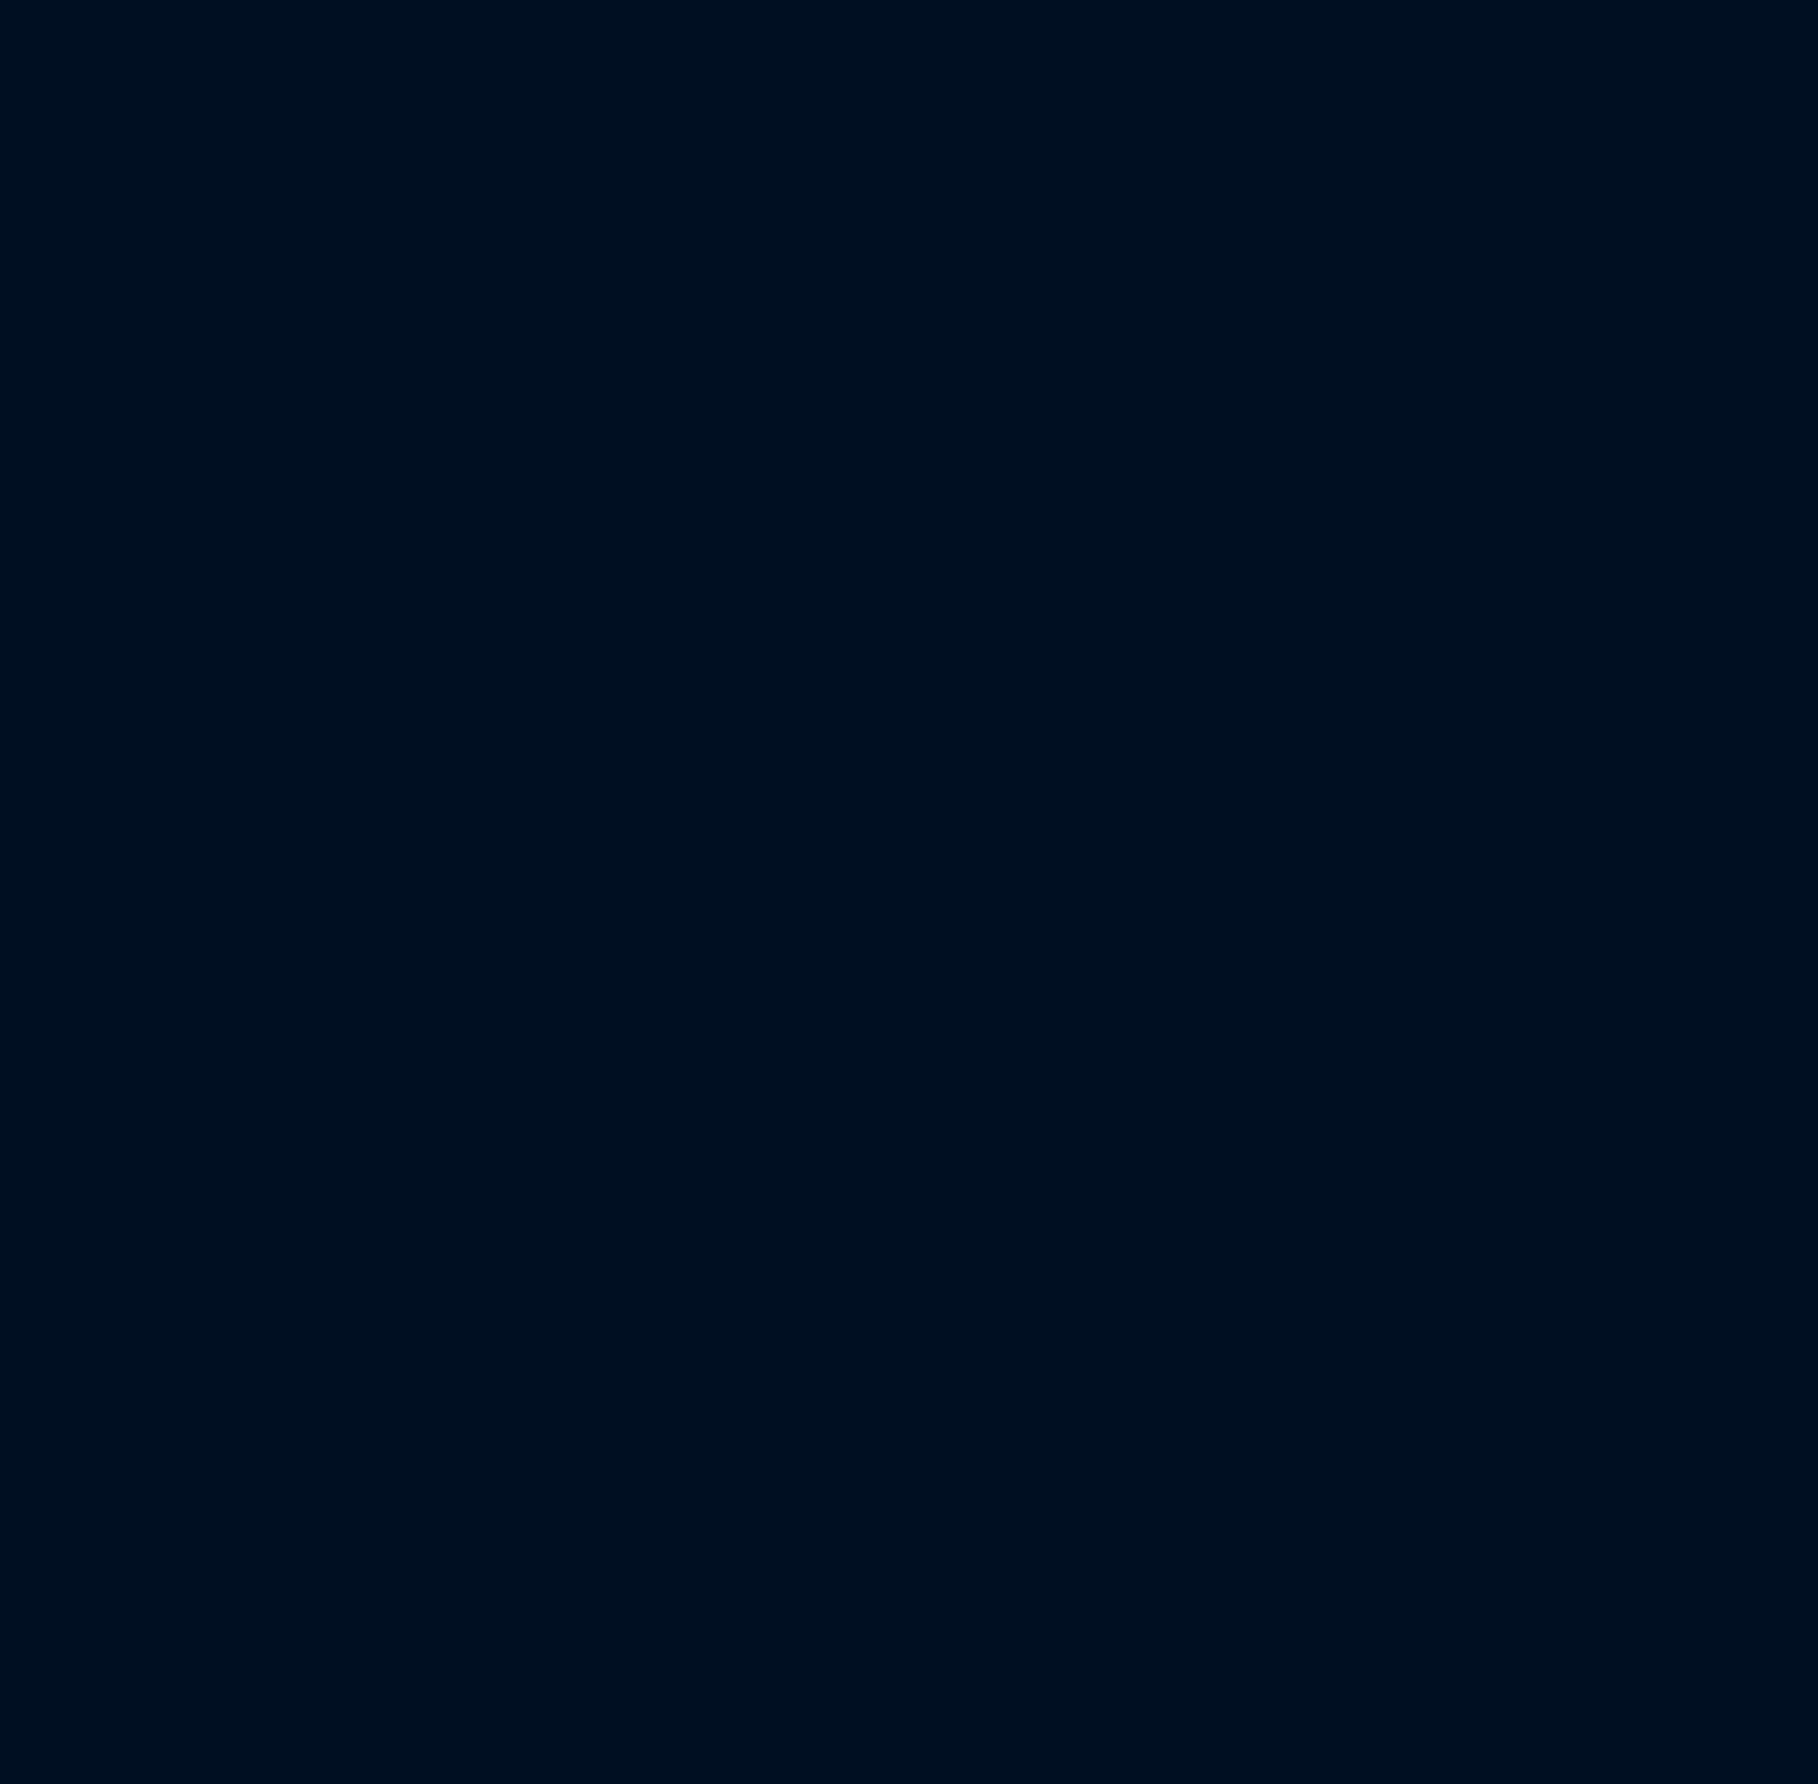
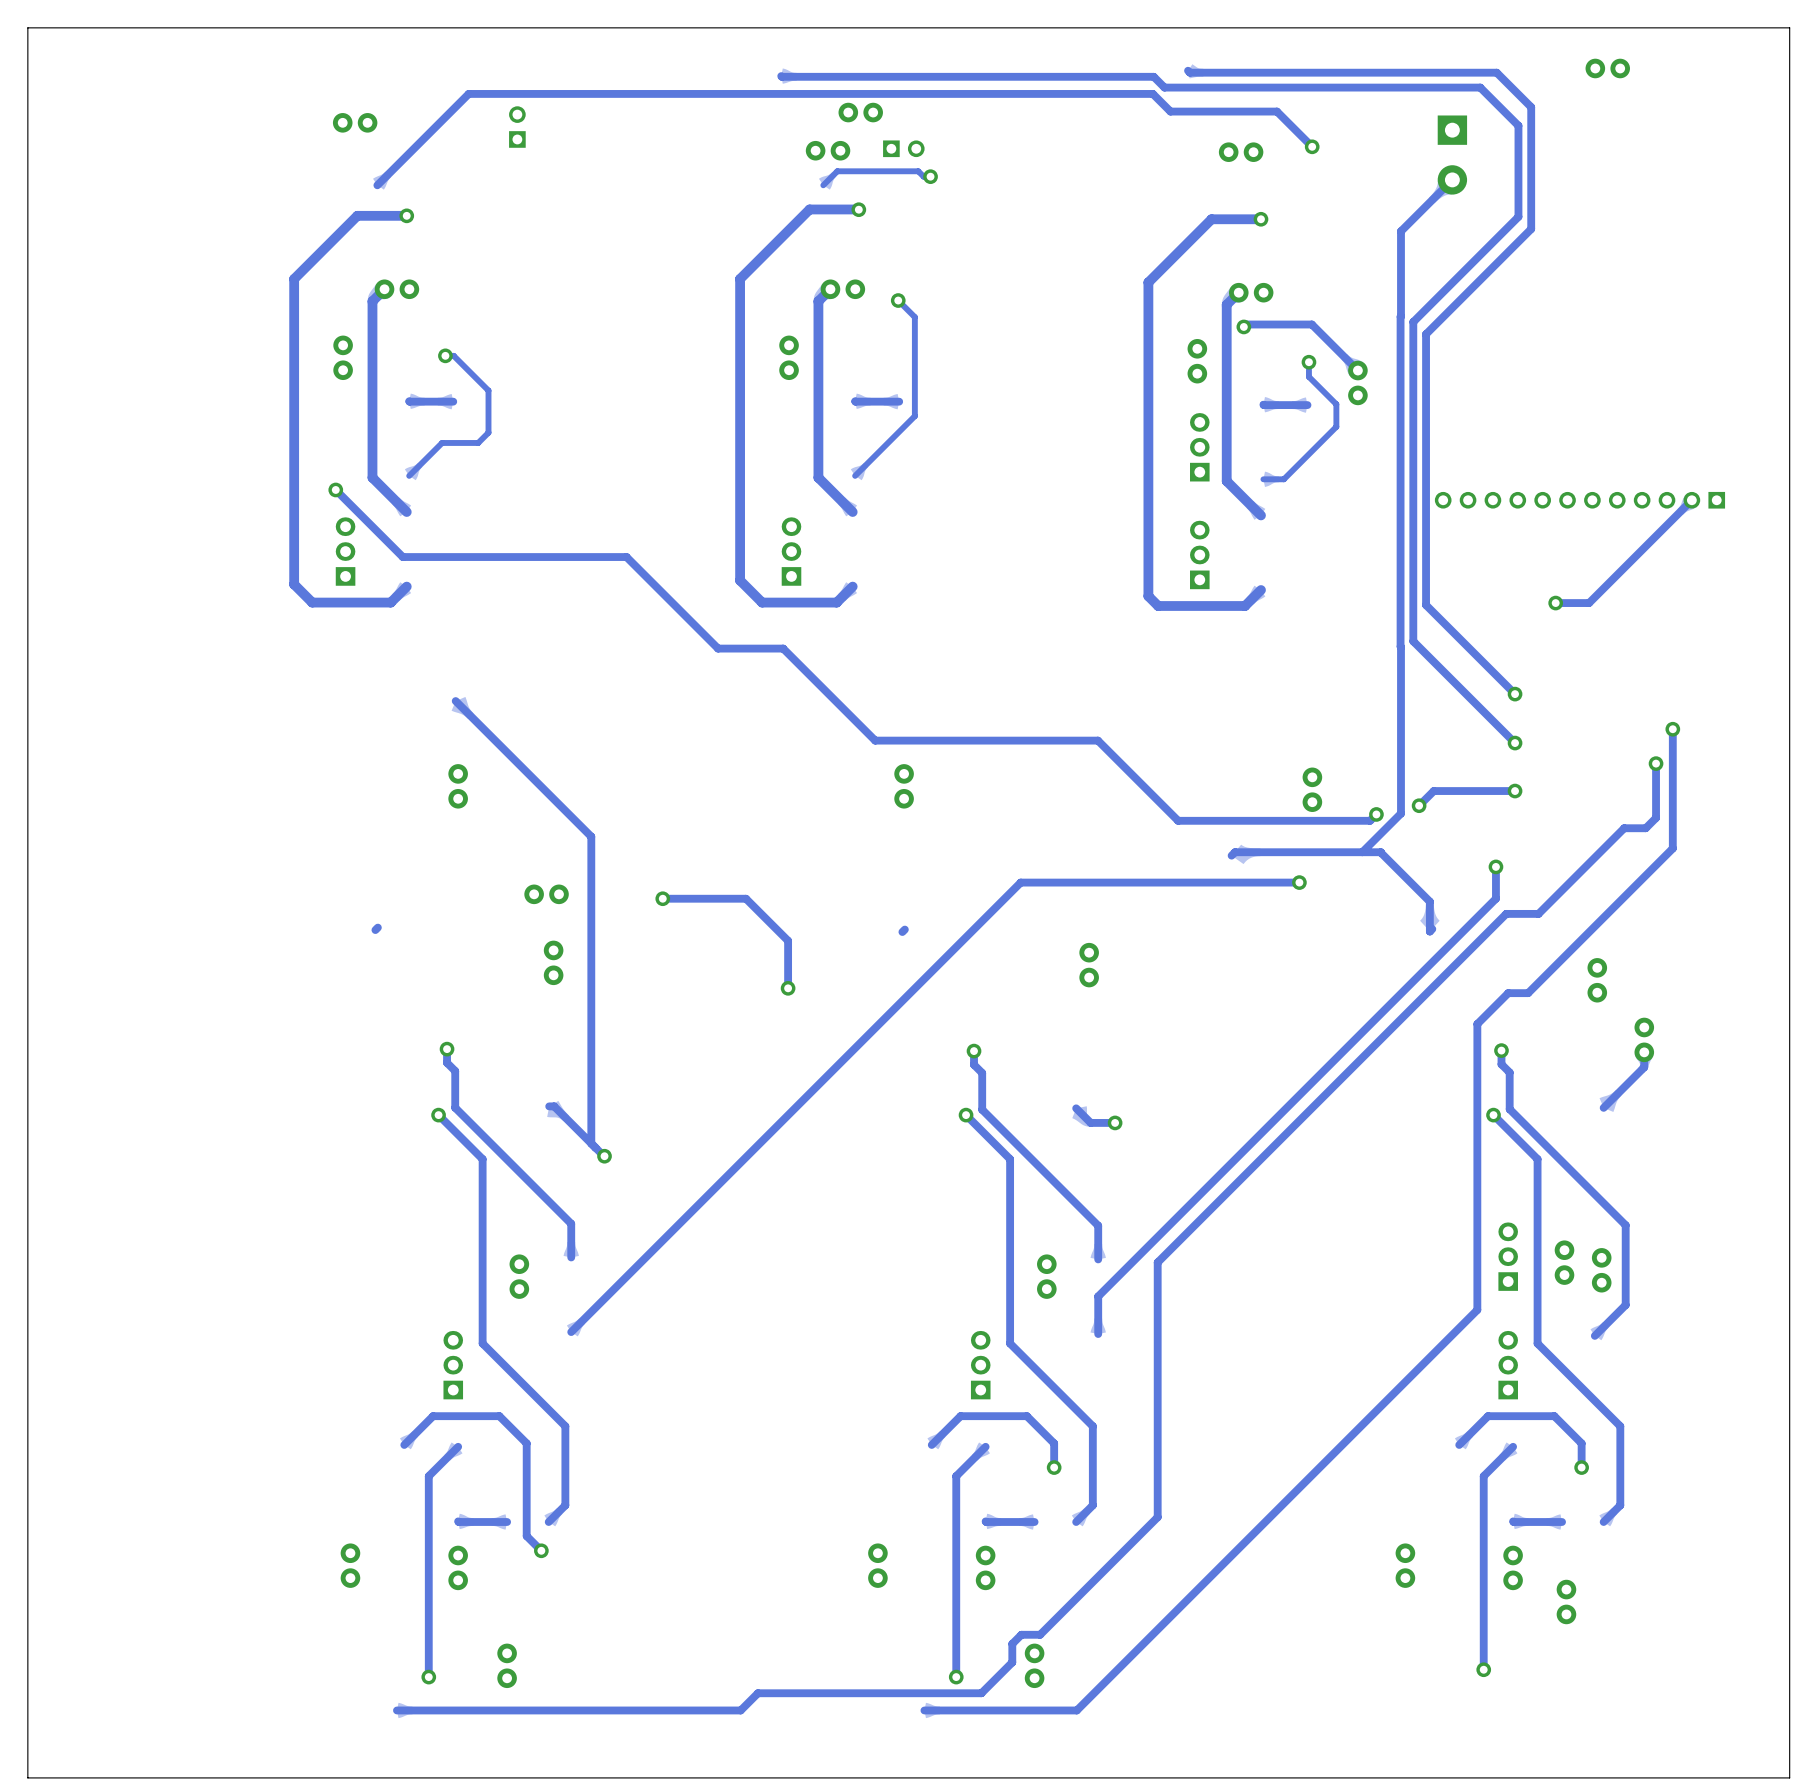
board edge: none -> (1789, 27) (27, 27) (27, 1777) (1789, 1777) (1789, 27)
part: none -> (1607, 68)
track: none -> (1188, 70) (1190, 72) (1496, 72) (1531, 107) (1531, 229) (1426, 334) (1426, 605) (1515, 694)
track: none -> (781, 76) (1153, 76) (1164, 87) (1480, 87) (1518, 125) (1518, 216) (1413, 321) (1413, 641) (1515, 743)
part: none -> (860, 112)
part: none -> (355, 122)
part: none -> (517, 127)
track: none -> (1312, 146) (1276, 111) (1170, 111) (1152, 93) (468, 93) (377, 185)
via: none -> (1312, 146)
part: none -> (903, 148)
part: none -> (828, 150)
part: none -> (1241, 152)
part: none -> (1452, 155)
track: none -> (930, 176) (923, 176) (918, 171) (837, 171) (823, 185)
via: none -> (930, 176)
track: none -> (1452, 179) (1400, 231) (1400, 813) (1362, 852)
track: none -> (858, 209) (809, 209) (740, 279) (740, 580) (762, 602) (836, 602) (852, 586)
via: none -> (858, 209)
track: none -> (406, 215) (357, 215) (294, 279) (294, 584) (312, 602) (390, 602) (406, 586)
via: none -> (406, 215)
track: none -> (1260, 219) (1211, 219) (1148, 282) (1148, 596) (1158, 605) (1245, 605) (1260, 590)
via: none -> (1260, 219)
track: none -> (384, 289) (372, 301) (372, 477) (406, 512)
part: none -> (396, 289)
track: none -> (830, 289) (818, 301) (818, 477) (852, 512)
part: none -> (842, 289)
track: none -> (1238, 292) (1226, 304) (1226, 481) (1260, 515)
part: none -> (1251, 292)
track: none -> (898, 300) (914, 317) (914, 416) (855, 475)
via: none -> (898, 300)
track: none -> (1243, 326) (1246, 324) (1311, 324) (1357, 370)
via: none -> (1243, 326)
track: none -> (445, 355) (453, 355) (488, 390) (488, 432) (478, 442) (442, 442) (409, 475)
via: none -> (445, 355)
part: none -> (343, 357)
part: none -> (789, 357)
part: none -> (1197, 361)
track: none -> (1308, 362) (1308, 376) (1336, 404) (1336, 426) (1283, 479) (1263, 479)
via: none -> (1308, 362)
part: none -> (1357, 382)
track: none -> (409, 401) (453, 401)
track: none -> (855, 401) (899, 401)
track: none -> (1263, 404) (1307, 405)
part: none -> (1199, 447)
track: none -> (335, 489) (402, 557) (626, 557) (718, 648) (783, 648) (875, 740) (1097, 740) (1178, 820) (1370, 820) (1376, 814)
via: none -> (335, 489)
part: none -> (1579, 500)
track: none -> (1691, 500) (1589, 603) (1555, 603)
part: none -> (345, 551)
part: none -> (791, 551)
part: none -> (1199, 554)
via: none -> (1555, 603)
via: none -> (1515, 694)
track: none -> (455, 701) (591, 836) (591, 1143)
track: none -> (1672, 729) (1672, 848) (1528, 993) (1508, 993) (1477, 1024) (1477, 1309) (1076, 1710) (924, 1710)
via: none -> (1672, 729)
via: none -> (1515, 743)
track: none -> (1656, 763) (1656, 817) (1645, 828) (1624, 828) (1538, 913) (1506, 913) (1157, 1262) (1157, 1517) (1040, 1634) (1021, 1634) (1012, 1643) (1012, 1662) (981, 1693) (757, 1693) (740, 1710) (396, 1710)
via: none -> (1656, 763)
part: none -> (458, 786)
part: none -> (904, 786)
part: none -> (1312, 789)
track: none -> (1515, 791) (1433, 791) (1419, 805)
via: none -> (1515, 791)
via: none -> (1419, 805)
via: none -> (1376, 814)
track: none -> (1231, 855) (1235, 852) (1380, 852) (1429, 901) (1429, 931) (1432, 929)
track: none -> (1495, 866) (1495, 898) (1098, 1296) (1098, 1334)
via: none -> (1495, 866)
track: none -> (1299, 882) (1020, 882) (571, 1332)
via: none -> (1299, 882)
part: none -> (546, 894)
track: none -> (662, 898) (746, 898) (788, 940) (788, 988)
via: none -> (662, 898)
track: none -> (377, 927) (375, 930)
track: none -> (904, 929) (902, 932)
part: none -> (553, 962)
part: none -> (1089, 965)
part: none -> (1597, 980)
via: none -> (788, 988)
part: none -> (1644, 1039)
track: none -> (447, 1049) (447, 1062) (455, 1071) (455, 1107) (571, 1223) (571, 1257)
via: none -> (447, 1049)
track: none -> (1501, 1050) (1501, 1064) (1509, 1072) (1509, 1109) (1625, 1225) (1625, 1305) (1594, 1335)
via: none -> (1501, 1050)
track: none -> (974, 1051) (974, 1064) (982, 1073) (982, 1109) (1098, 1225) (1098, 1259)
via: none -> (974, 1051)
track: none -> (1644, 1052) (1644, 1067) (1603, 1107)
track: none -> (549, 1106) (554, 1106) (604, 1156)
track: none -> (1076, 1108) (1090, 1122) (1115, 1122)
track: none -> (438, 1115) (482, 1159) (482, 1343) (565, 1426) (565, 1505) (548, 1522)
via: none -> (438, 1115)
track: none -> (966, 1115) (1010, 1159) (1010, 1343) (1092, 1426) (1092, 1505) (1076, 1522)
via: none -> (966, 1115)
track: none -> (1493, 1115) (1537, 1159) (1537, 1343) (1620, 1426) (1620, 1505) (1603, 1522)
via: none -> (1493, 1115)
via: none -> (1115, 1122)
via: none -> (604, 1156)
part: none -> (1508, 1256)
part: none -> (1564, 1262)
part: none -> (1601, 1270)
part: none -> (519, 1276)
part: none -> (1046, 1276)
part: none -> (453, 1365)
part: none -> (980, 1365)
part: none -> (1508, 1365)
track: none -> (404, 1444) (433, 1416) (499, 1416) (526, 1443) (526, 1536) (541, 1550)
track: none -> (931, 1444) (960, 1416) (1026, 1416) (1054, 1443) (1054, 1467)
track: none -> (1459, 1444) (1488, 1416) (1554, 1416) (1581, 1443) (1581, 1467)
track: none -> (458, 1446) (428, 1476) (428, 1677)
track: none -> (985, 1446) (956, 1476) (956, 1677)
track: none -> (1513, 1446) (1483, 1476) (1483, 1669)
via: none -> (1054, 1467)
via: none -> (1581, 1467)
track: none -> (458, 1521) (507, 1522)
track: none -> (985, 1521) (1034, 1522)
track: none -> (1513, 1521) (1562, 1522)
via: none -> (541, 1550)
part: none -> (350, 1565)
part: none -> (877, 1565)
part: none -> (1405, 1565)
part: none -> (458, 1567)
part: none -> (985, 1567)
part: none -> (1513, 1567)
part: none -> (1566, 1601)
part: none -> (507, 1665)
part: none -> (1034, 1665)
via: none -> (1483, 1669)
via: none -> (428, 1677)
via: none -> (956, 1677)

